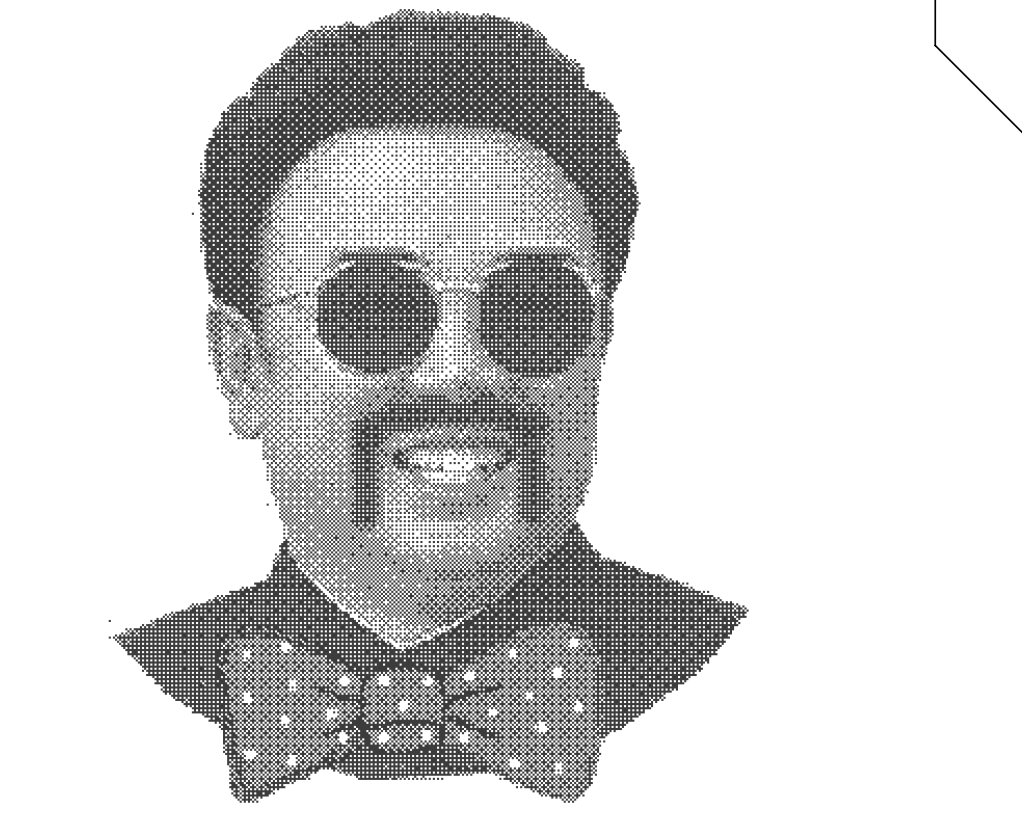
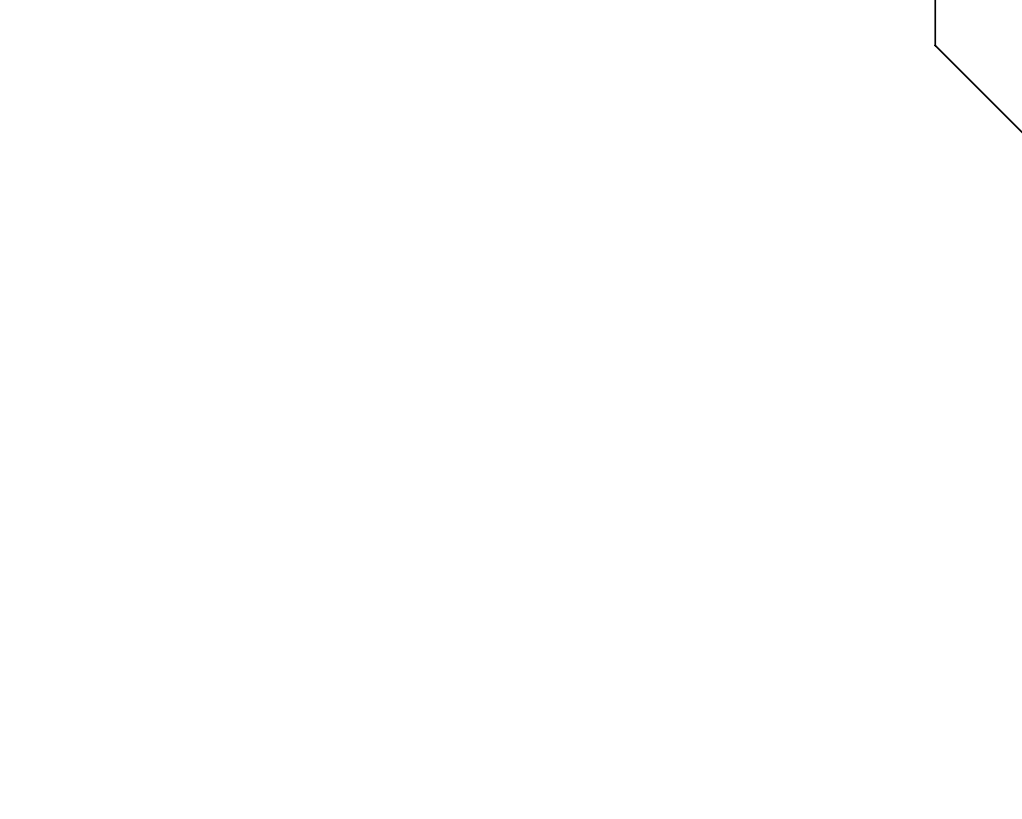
drawing: [108, 9, 749, 803] -> none

